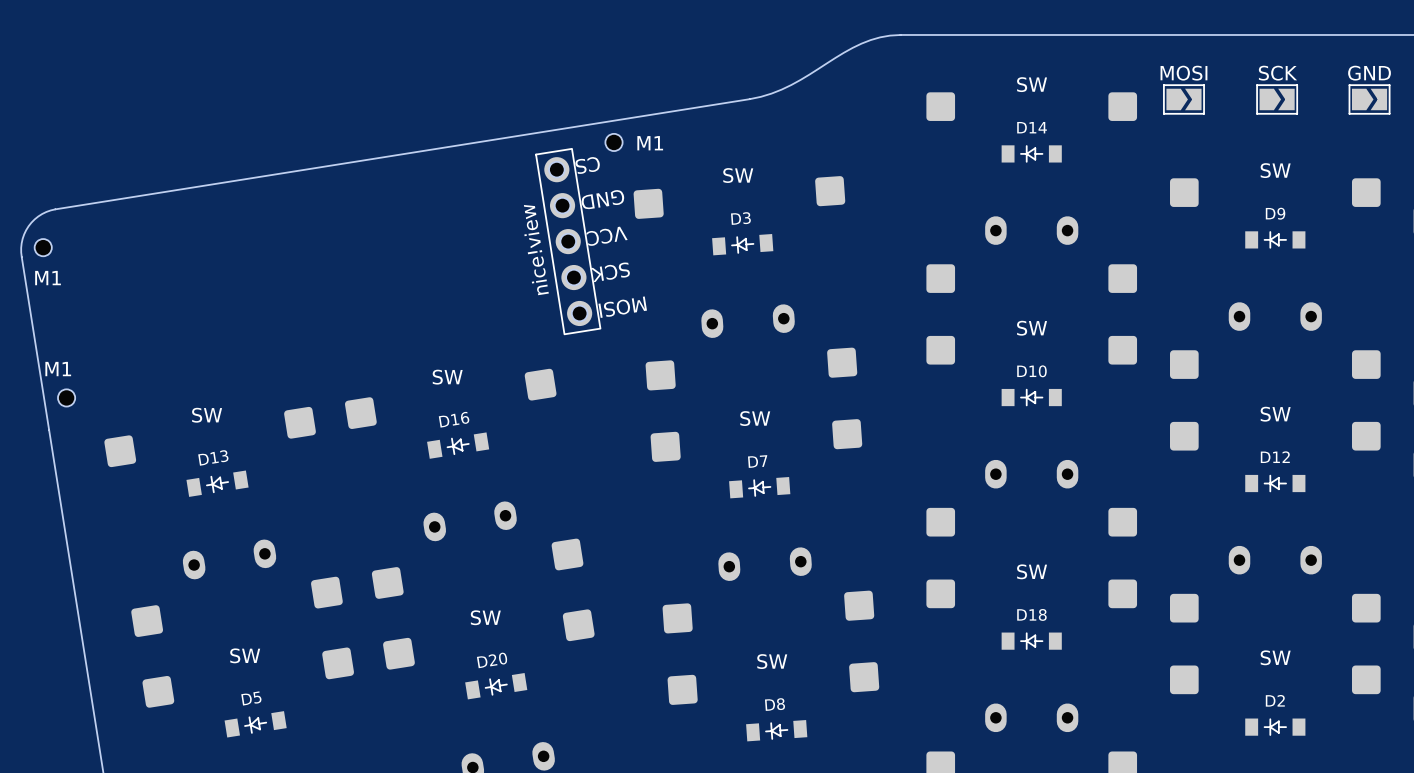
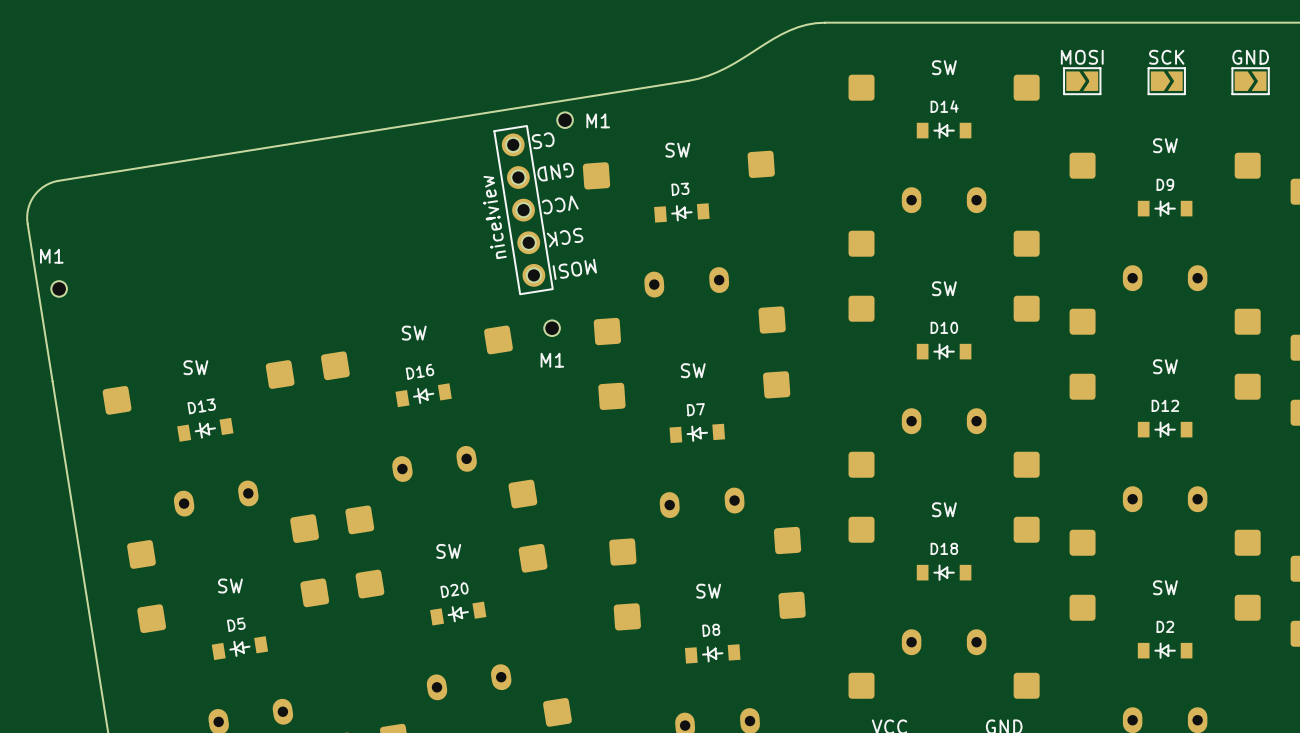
M1: (43, 247) -> none
M1: none -> (59, 288)
M1: none -> (552, 328)
M1: (66, 397) -> none

